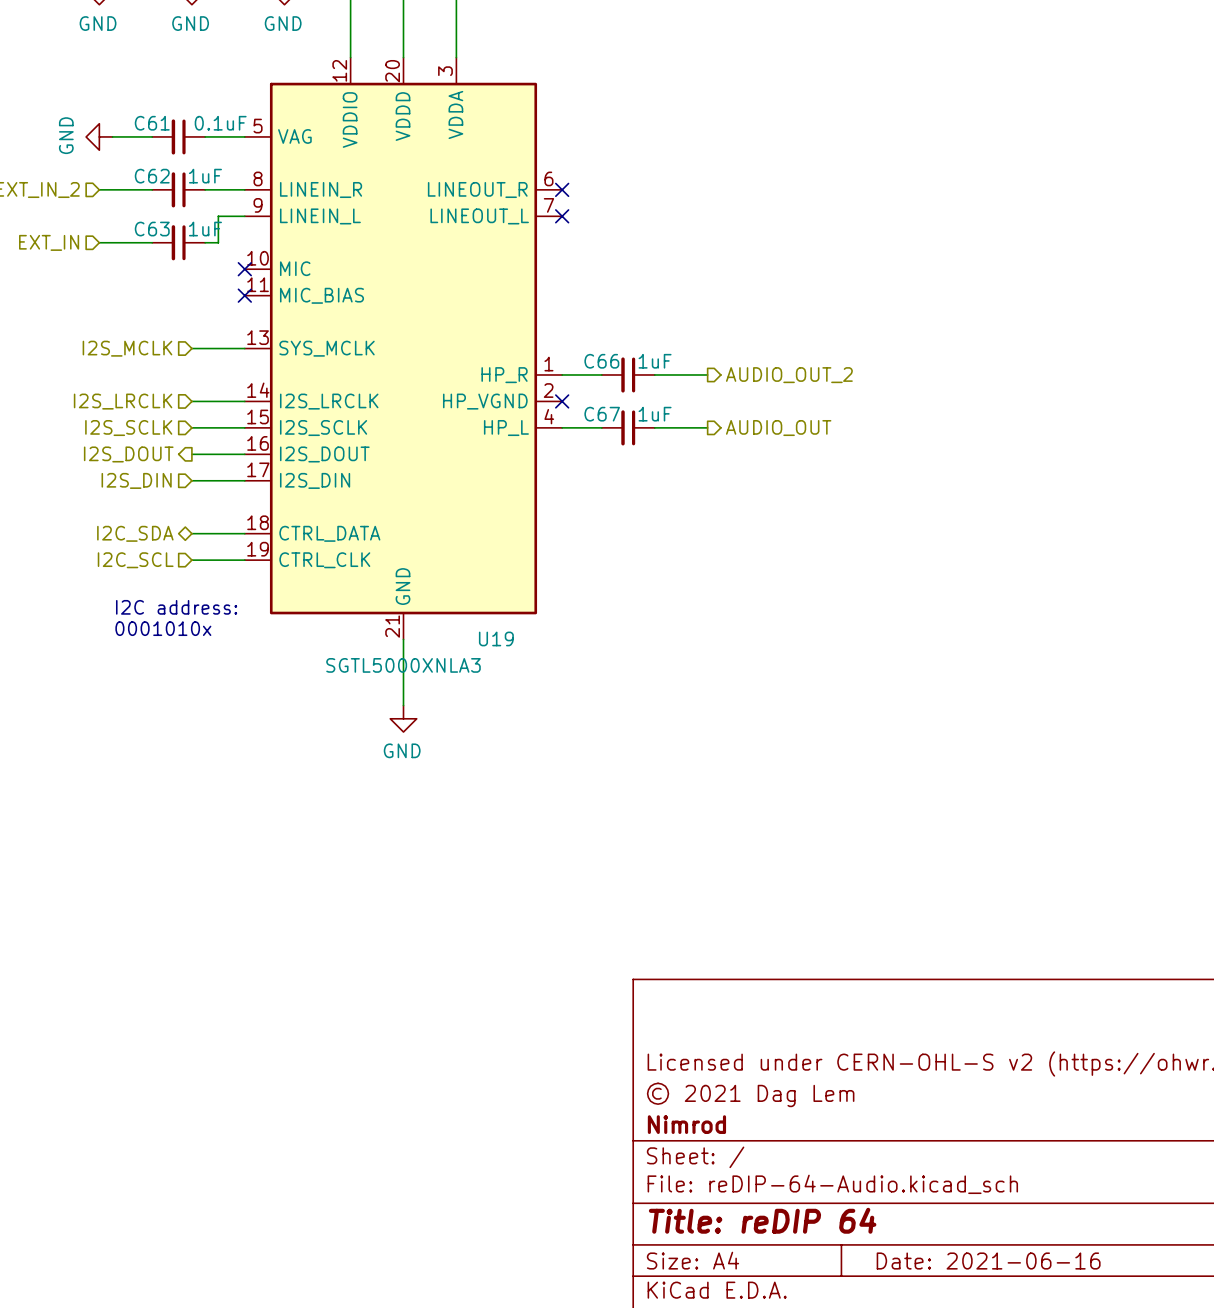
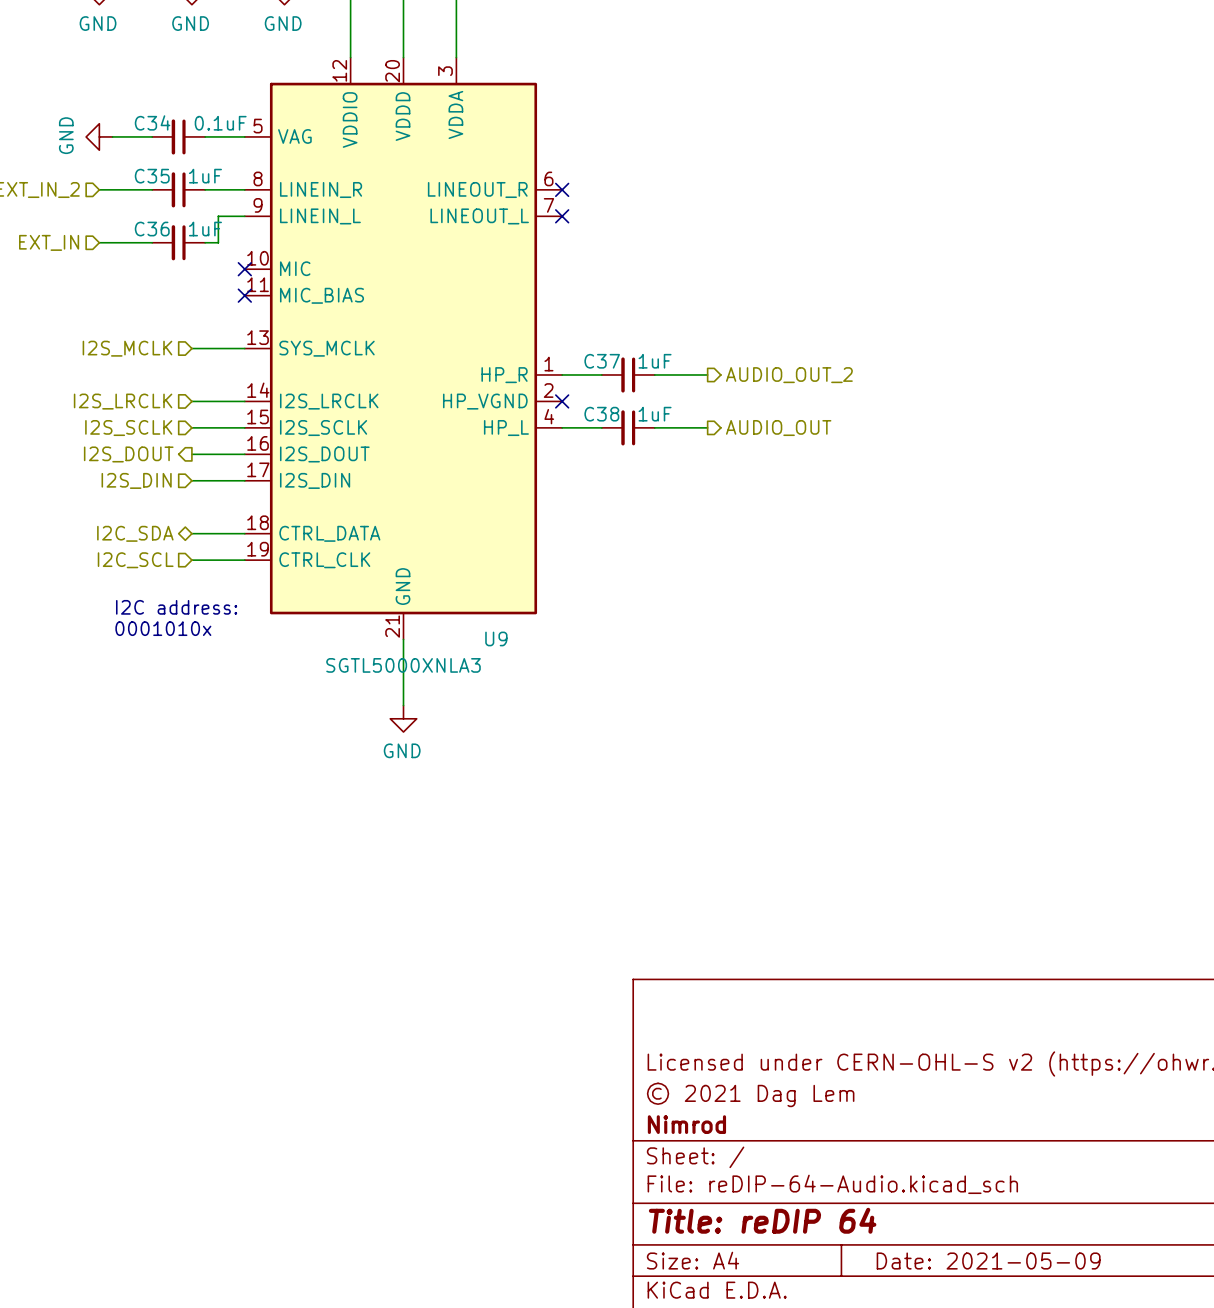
C61 name: C61 (152, 123) -> C34 (152, 122)
C62 name: C62 (152, 176) -> C35 (152, 176)
C63 name: C63 (152, 229) -> C36 (152, 229)
C66 name: C66 (601, 361) -> C37 (602, 361)
C67 name: C67 (602, 414) -> C38 (601, 414)
U19 name: U19 (496, 638) -> U9 (496, 638)
title block: Date: 2021-06-16 (988, 1261) -> Date: 2021-05-09 (988, 1261)

